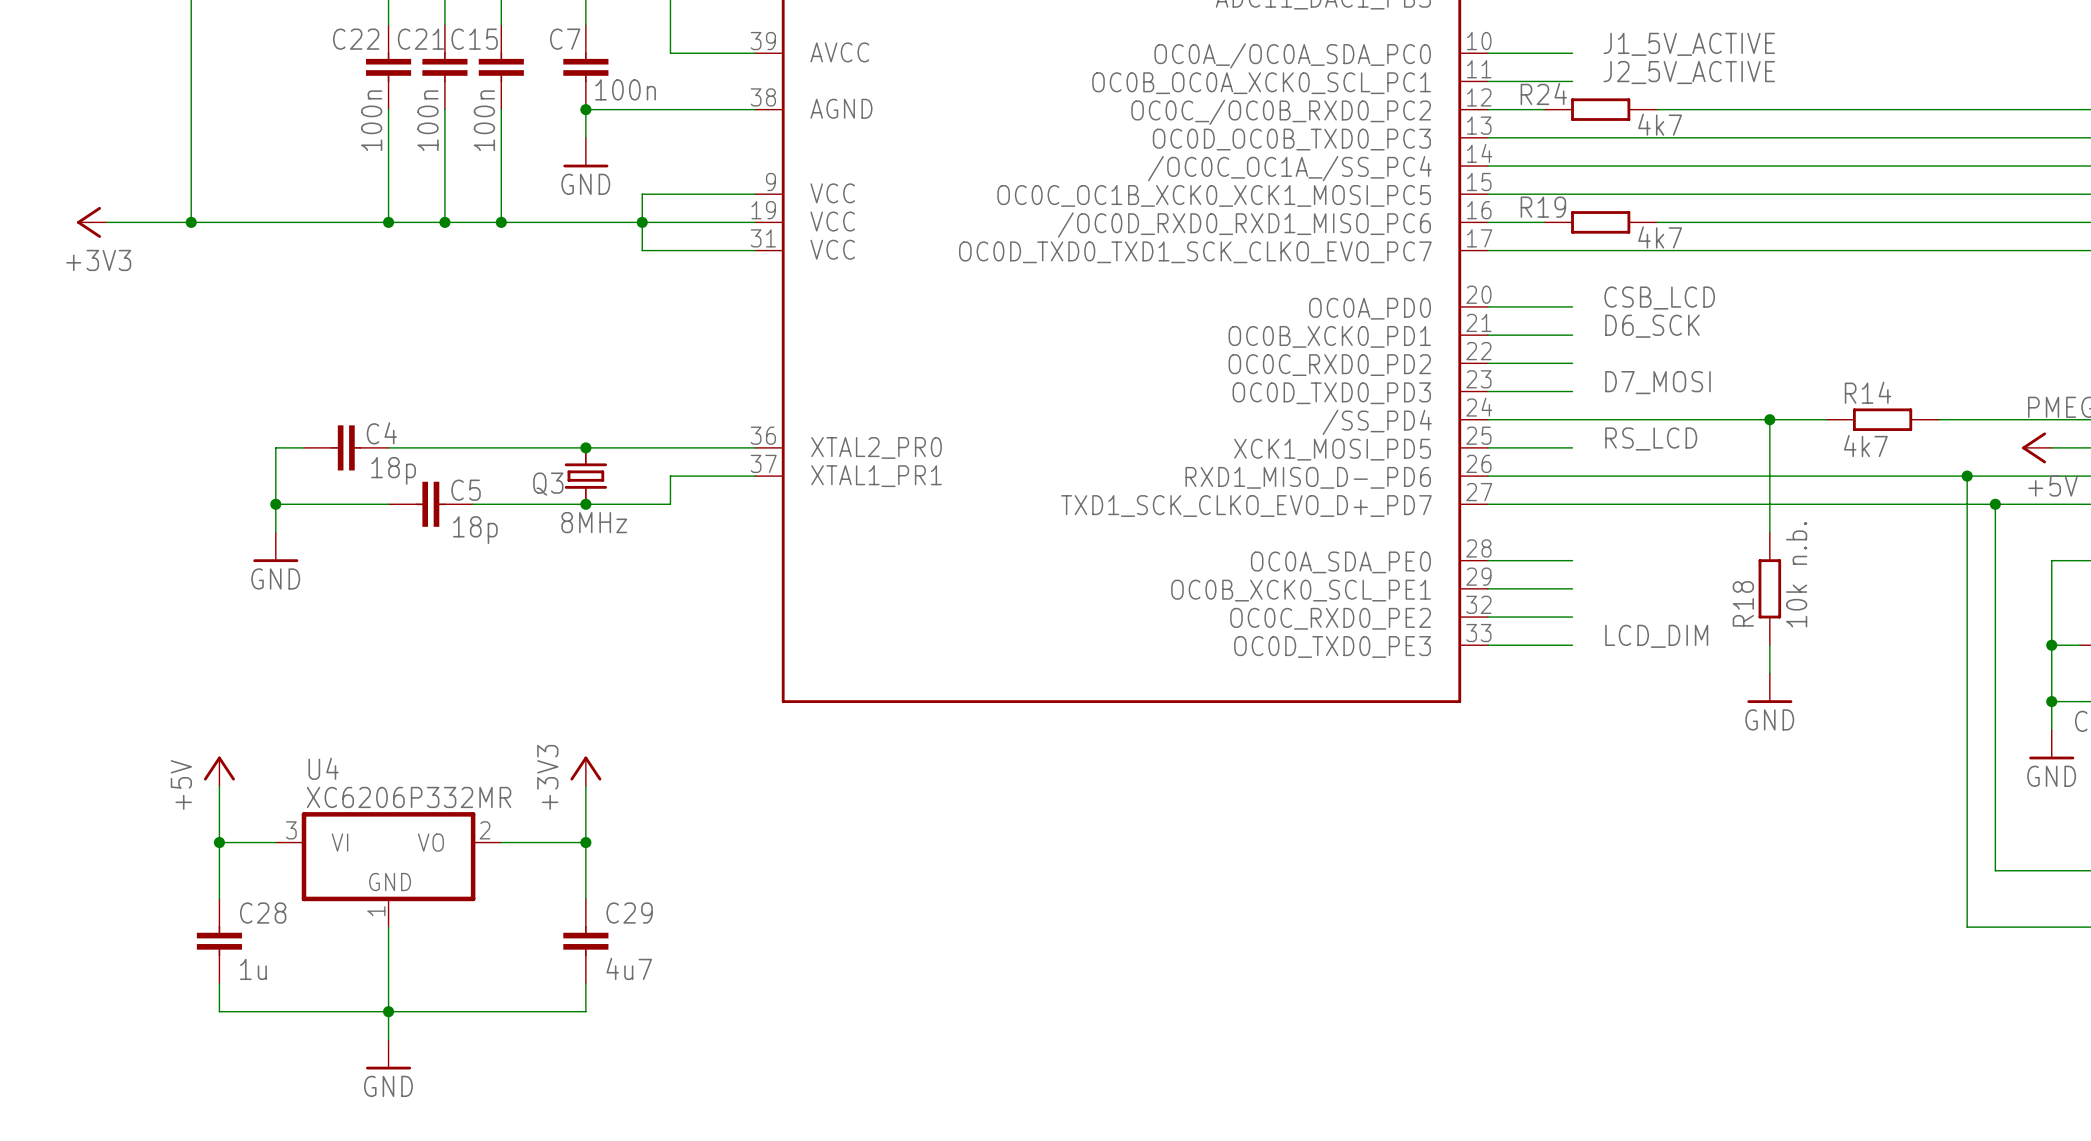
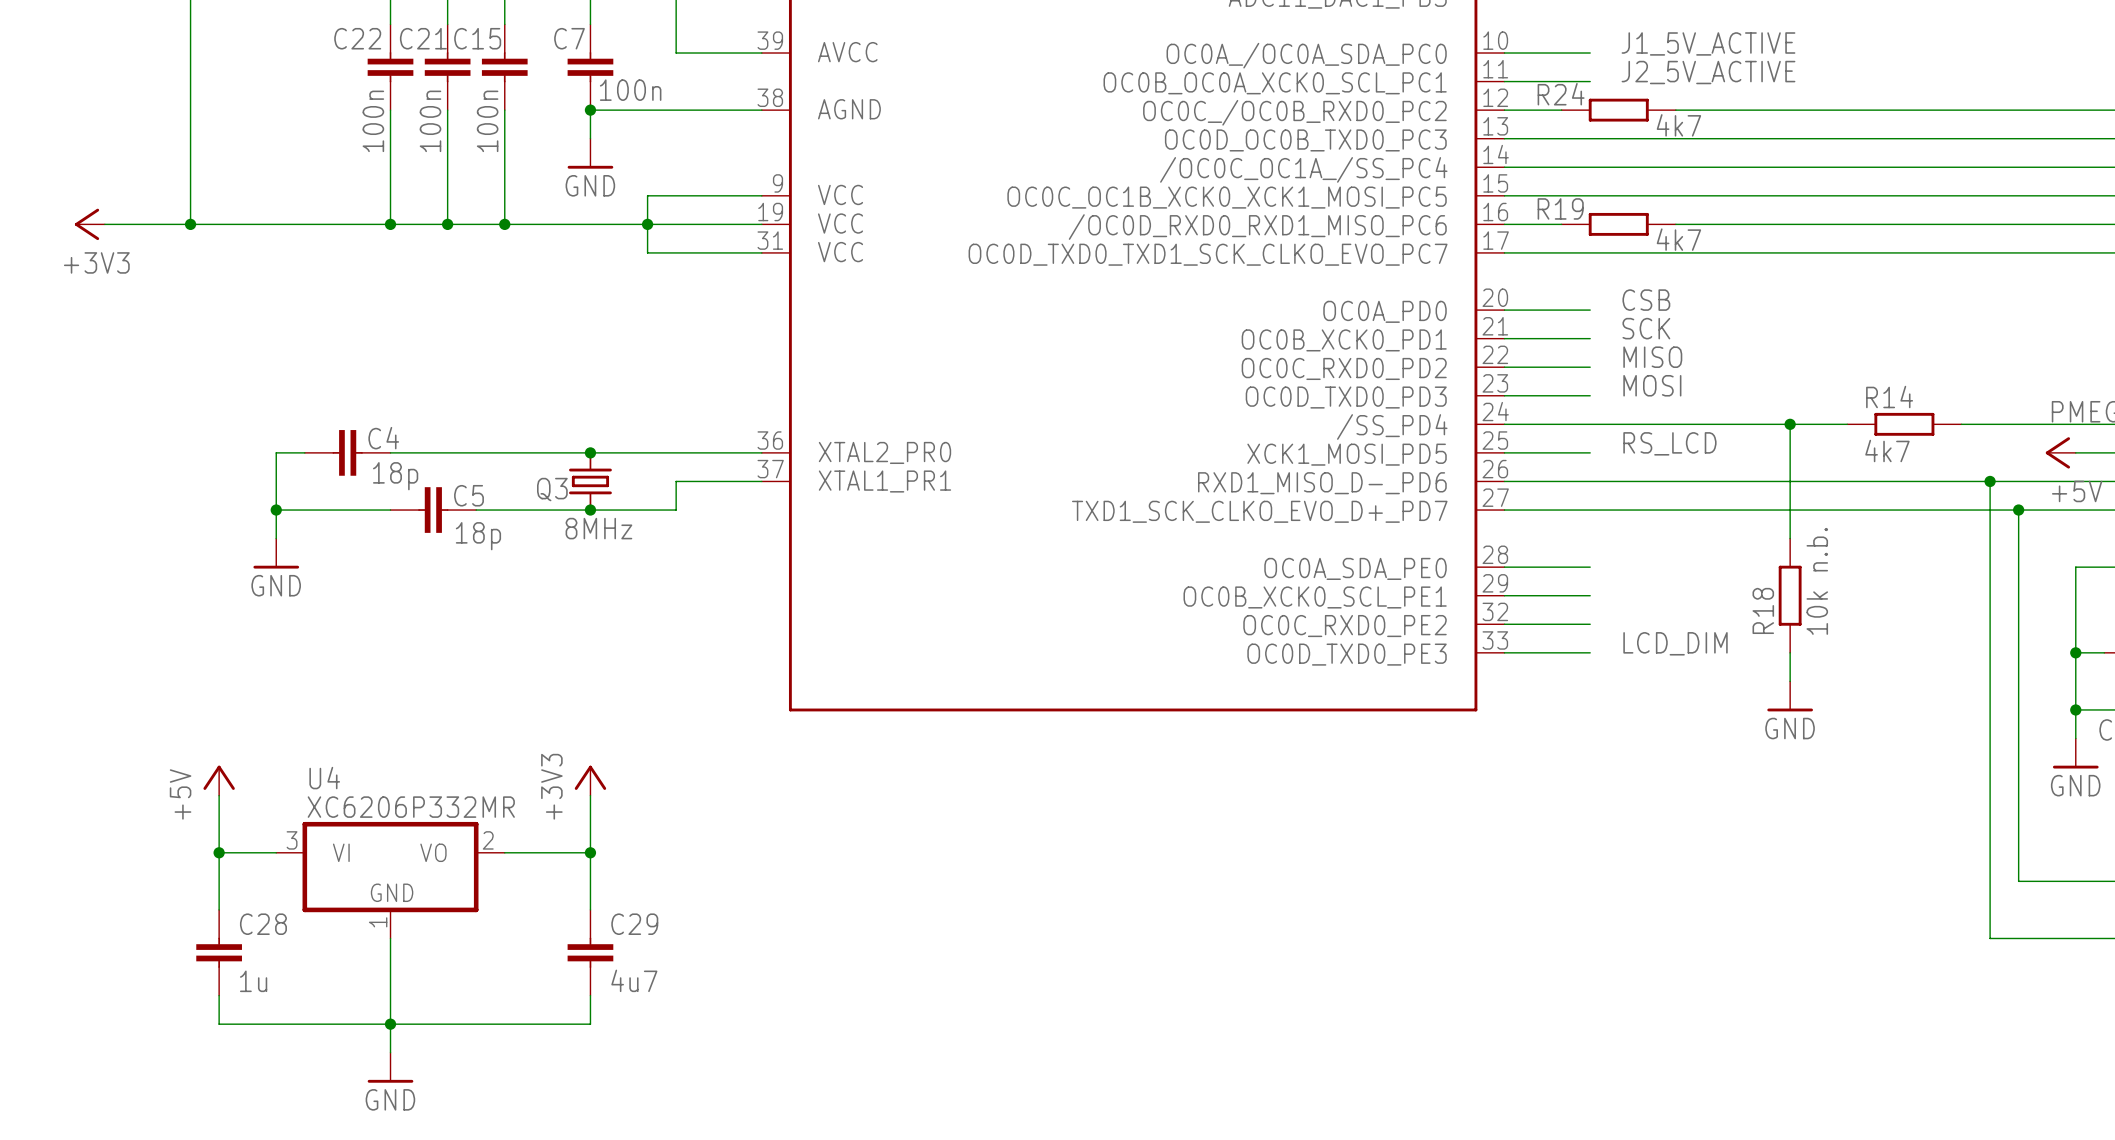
label: CSB_LCD (1659, 298) -> CSB (1646, 300)
label: D6_SCK (1652, 326) -> SCK (1646, 328)
label: none -> MISO (1652, 357)
label: D7_MOSI (1657, 382) -> MOSI (1652, 385)

